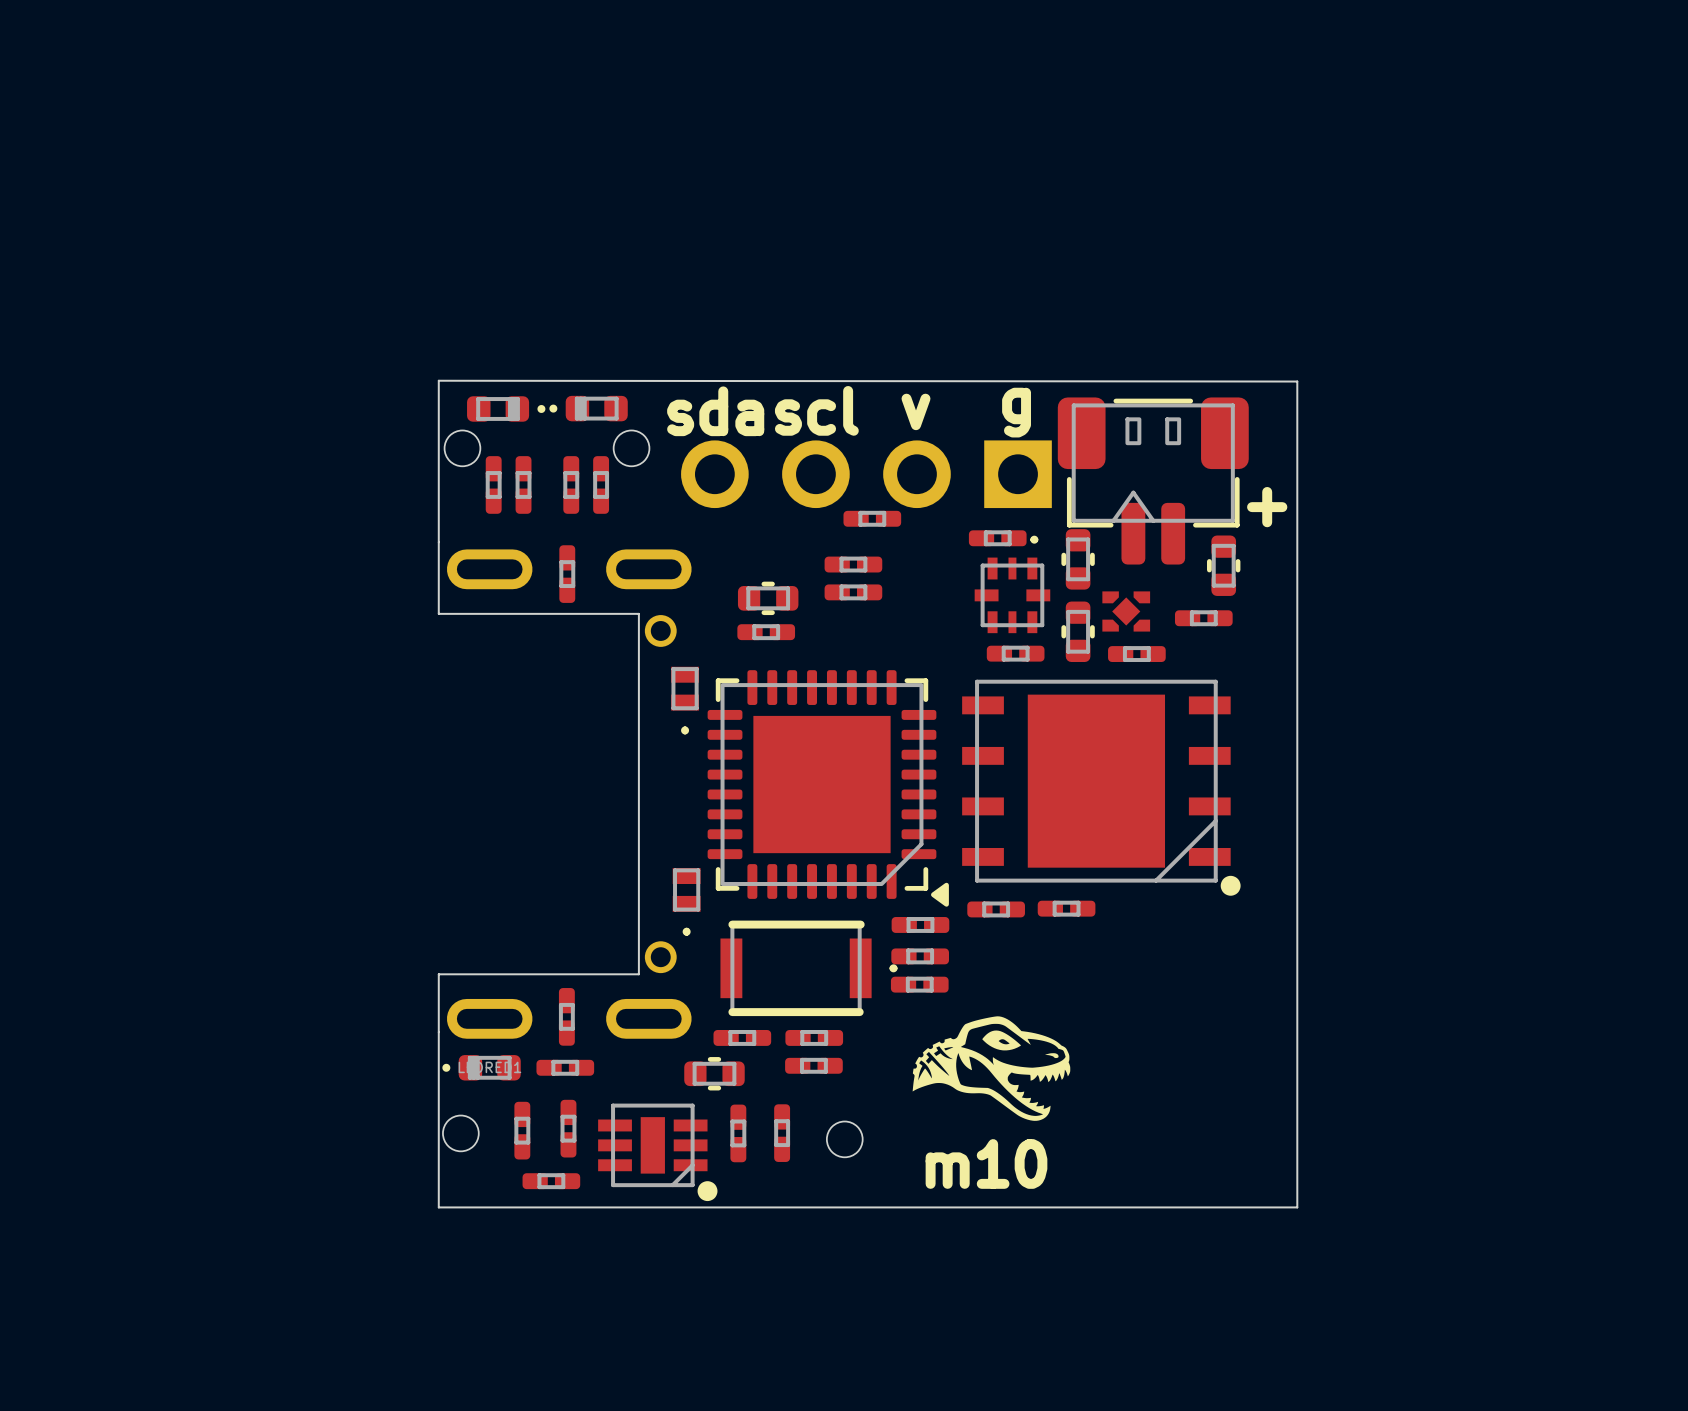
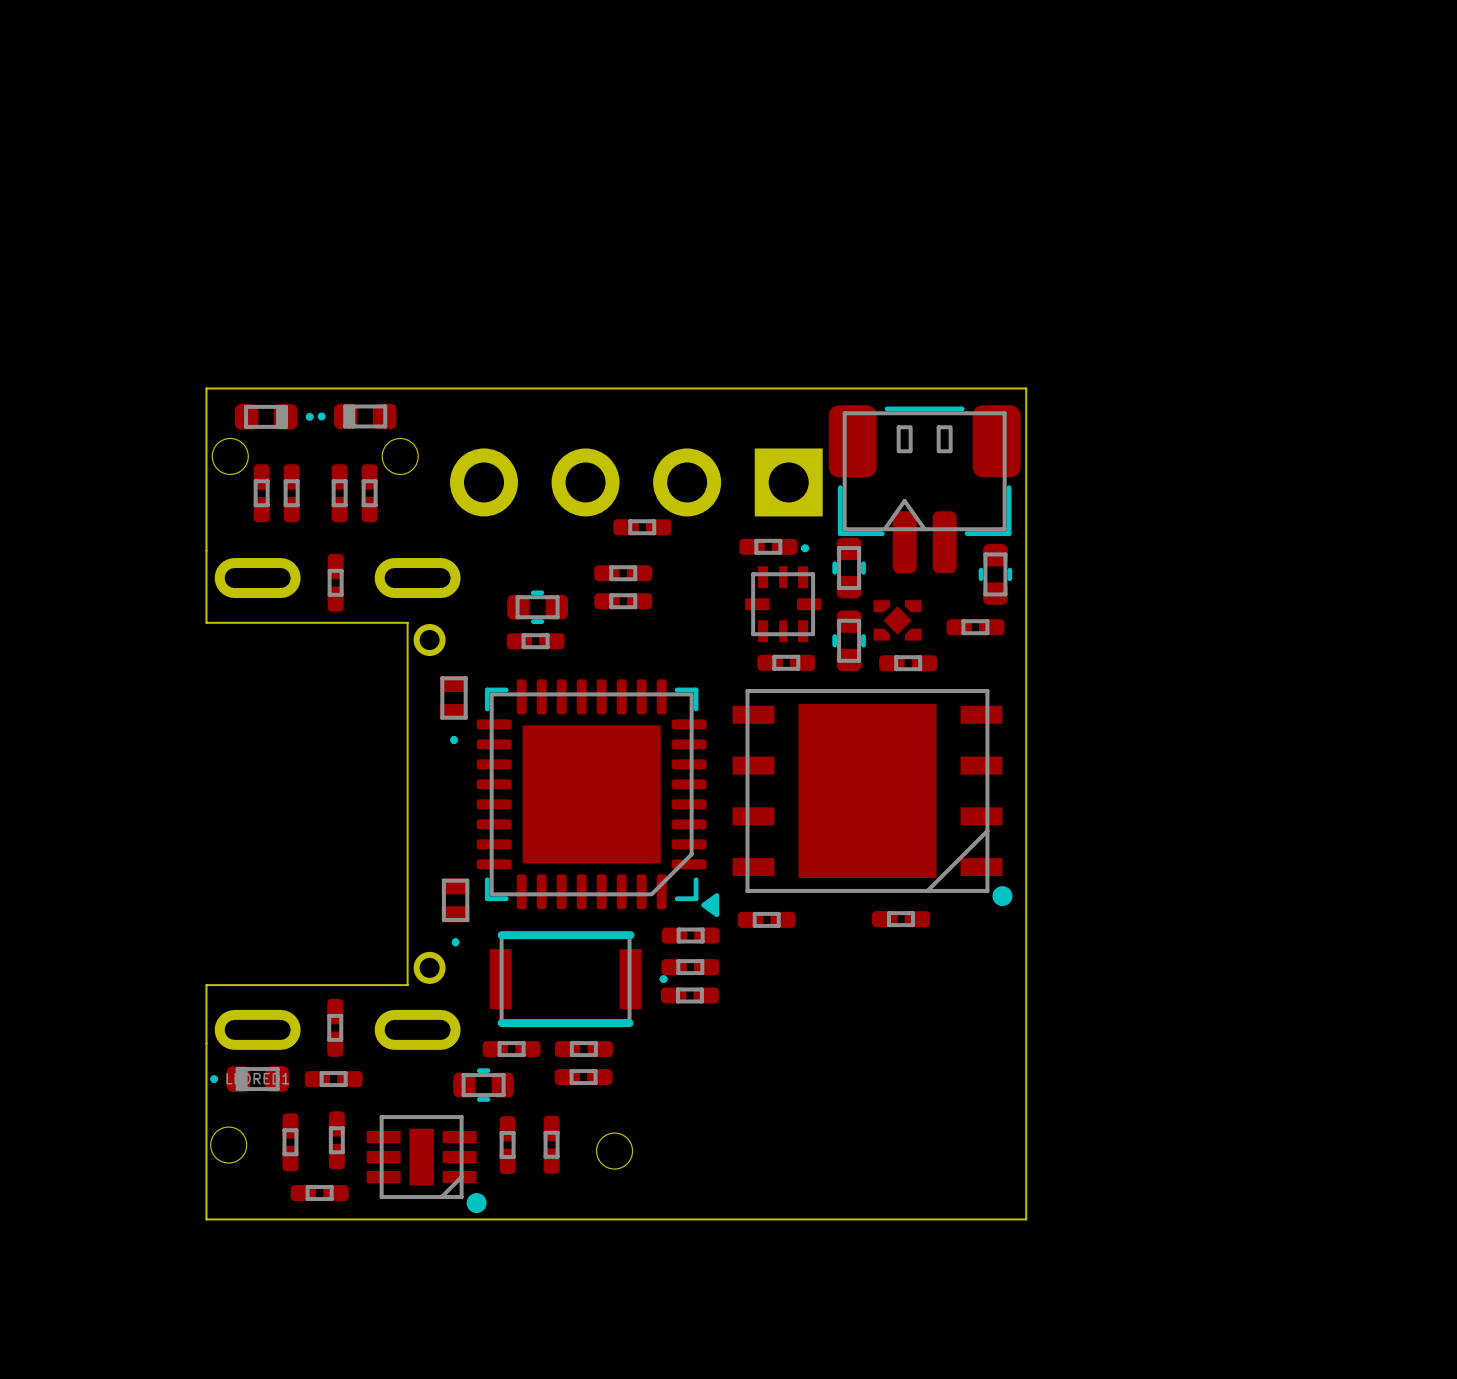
board edge: (438, 380) (1297, 381) (1297, 1207) (1254, 1207) -> (206, 388) (1026, 388) (1026, 1219)
text: scl (816, 410) -> none
text: sda (715, 411) -> none
text: v (916, 411) -> none
text: g (1016, 412) -> none
text: + (1267, 507) -> none
part position: (1066, 908) -> (900, 919)
drawing: [912, 1016, 1071, 1121] -> none
text: m10 (986, 1163) -> none

